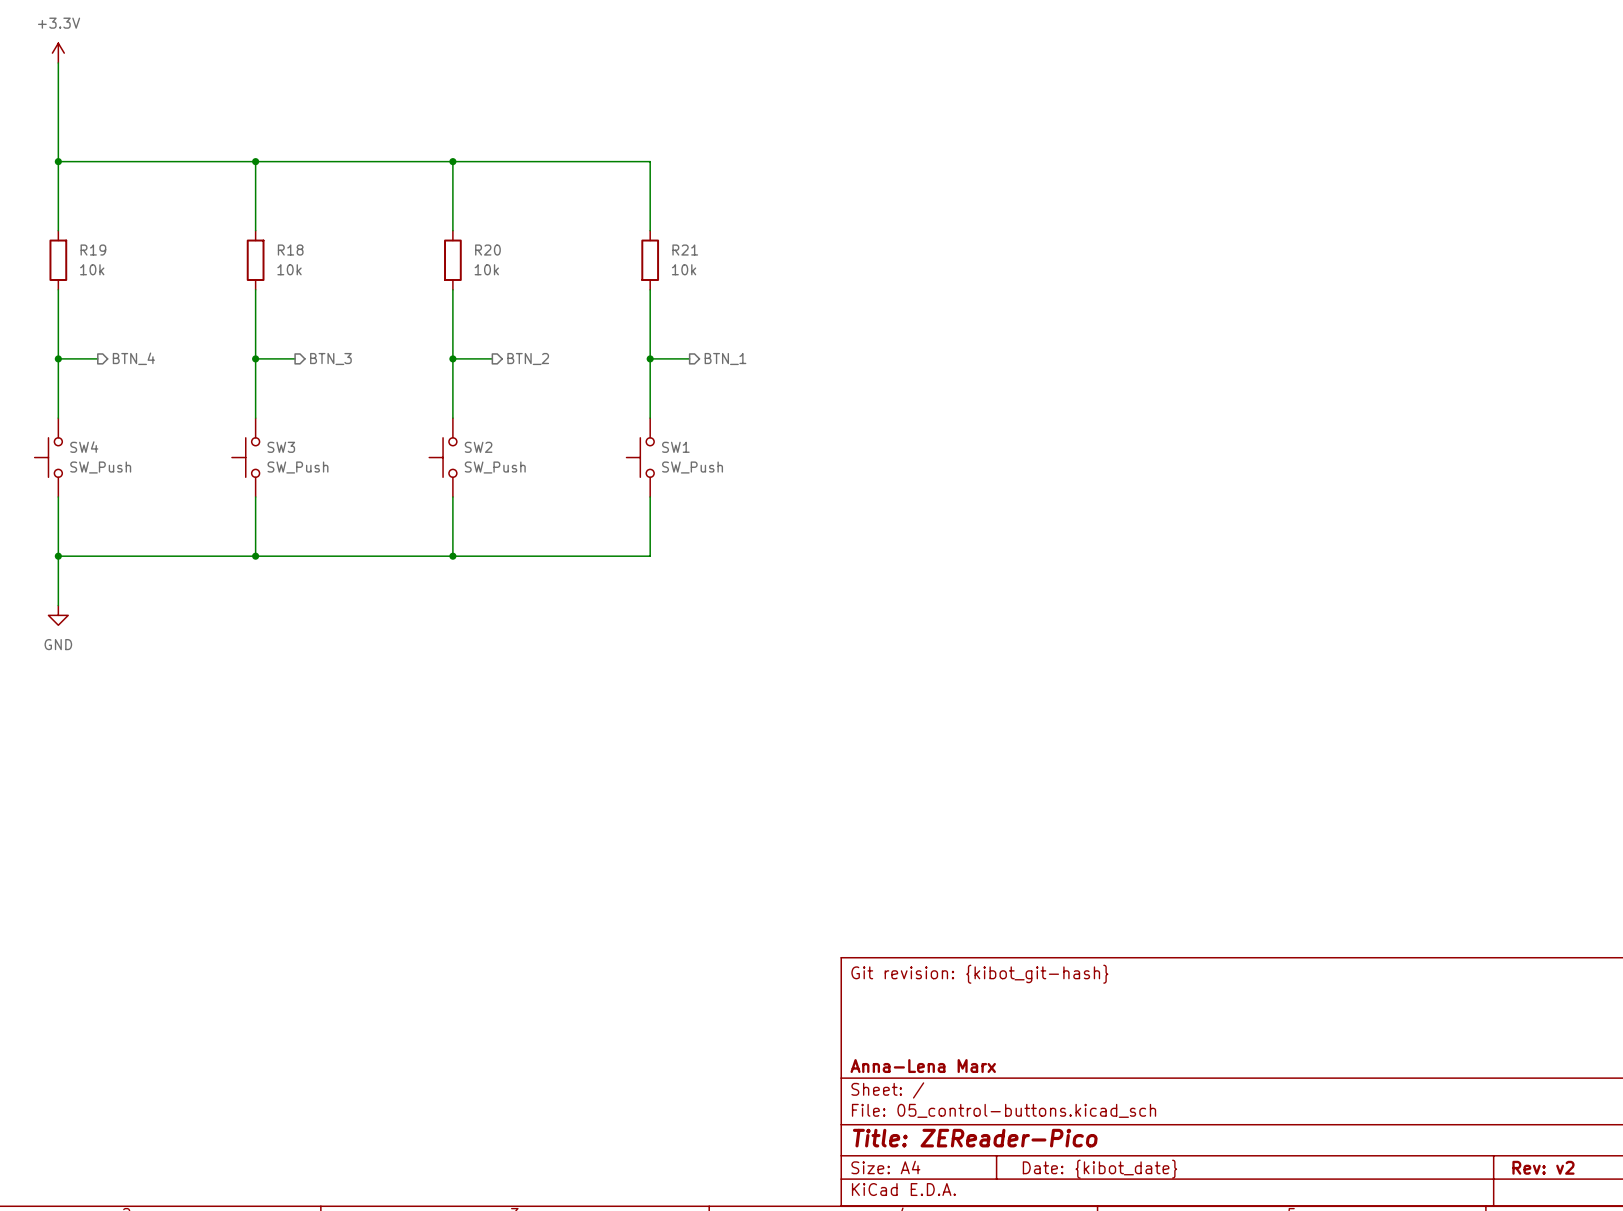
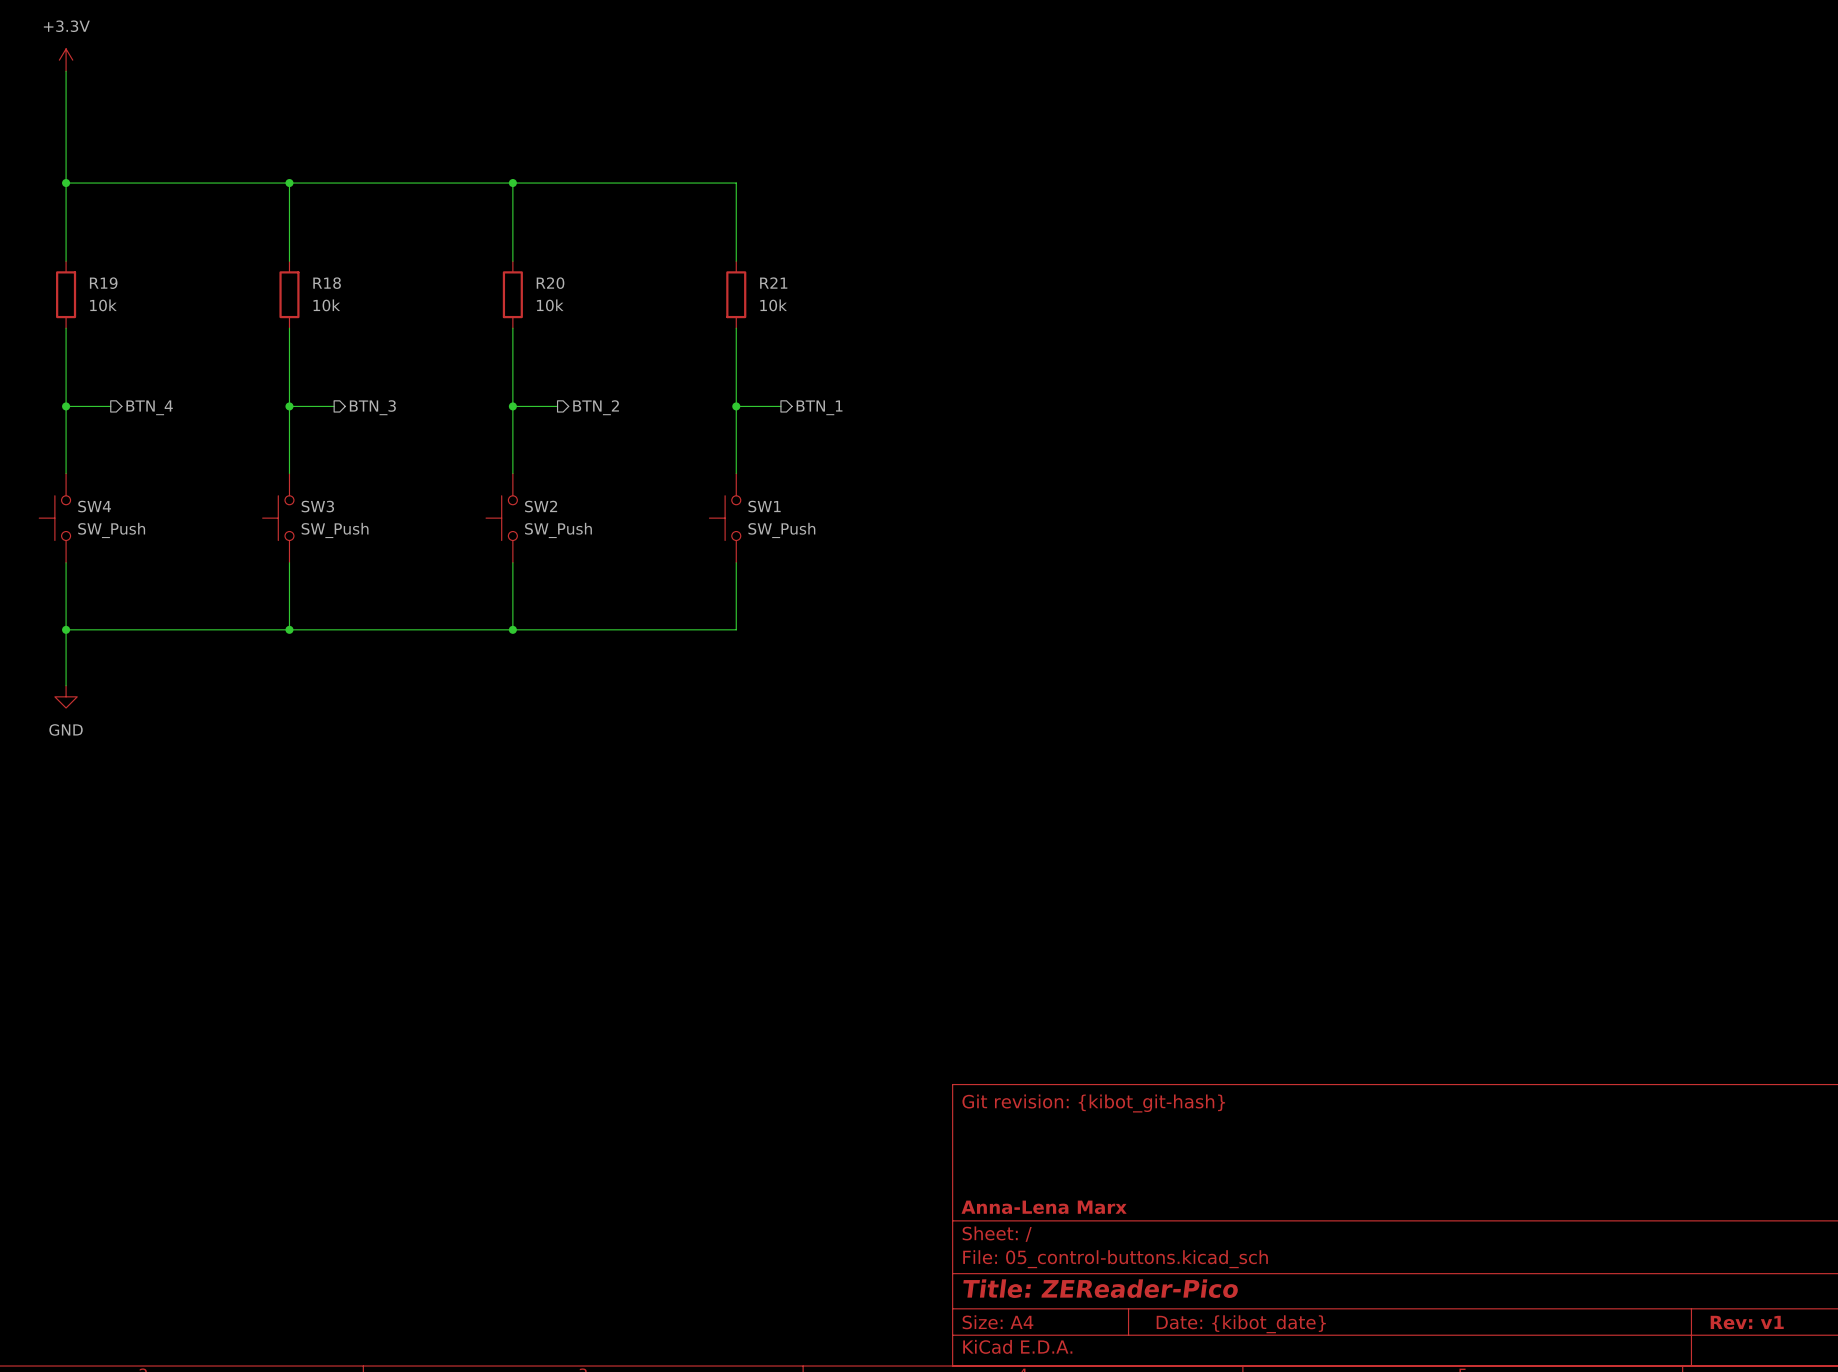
title block: Rev: v2 (1543, 1167) -> Rev: v1 (1747, 1322)

